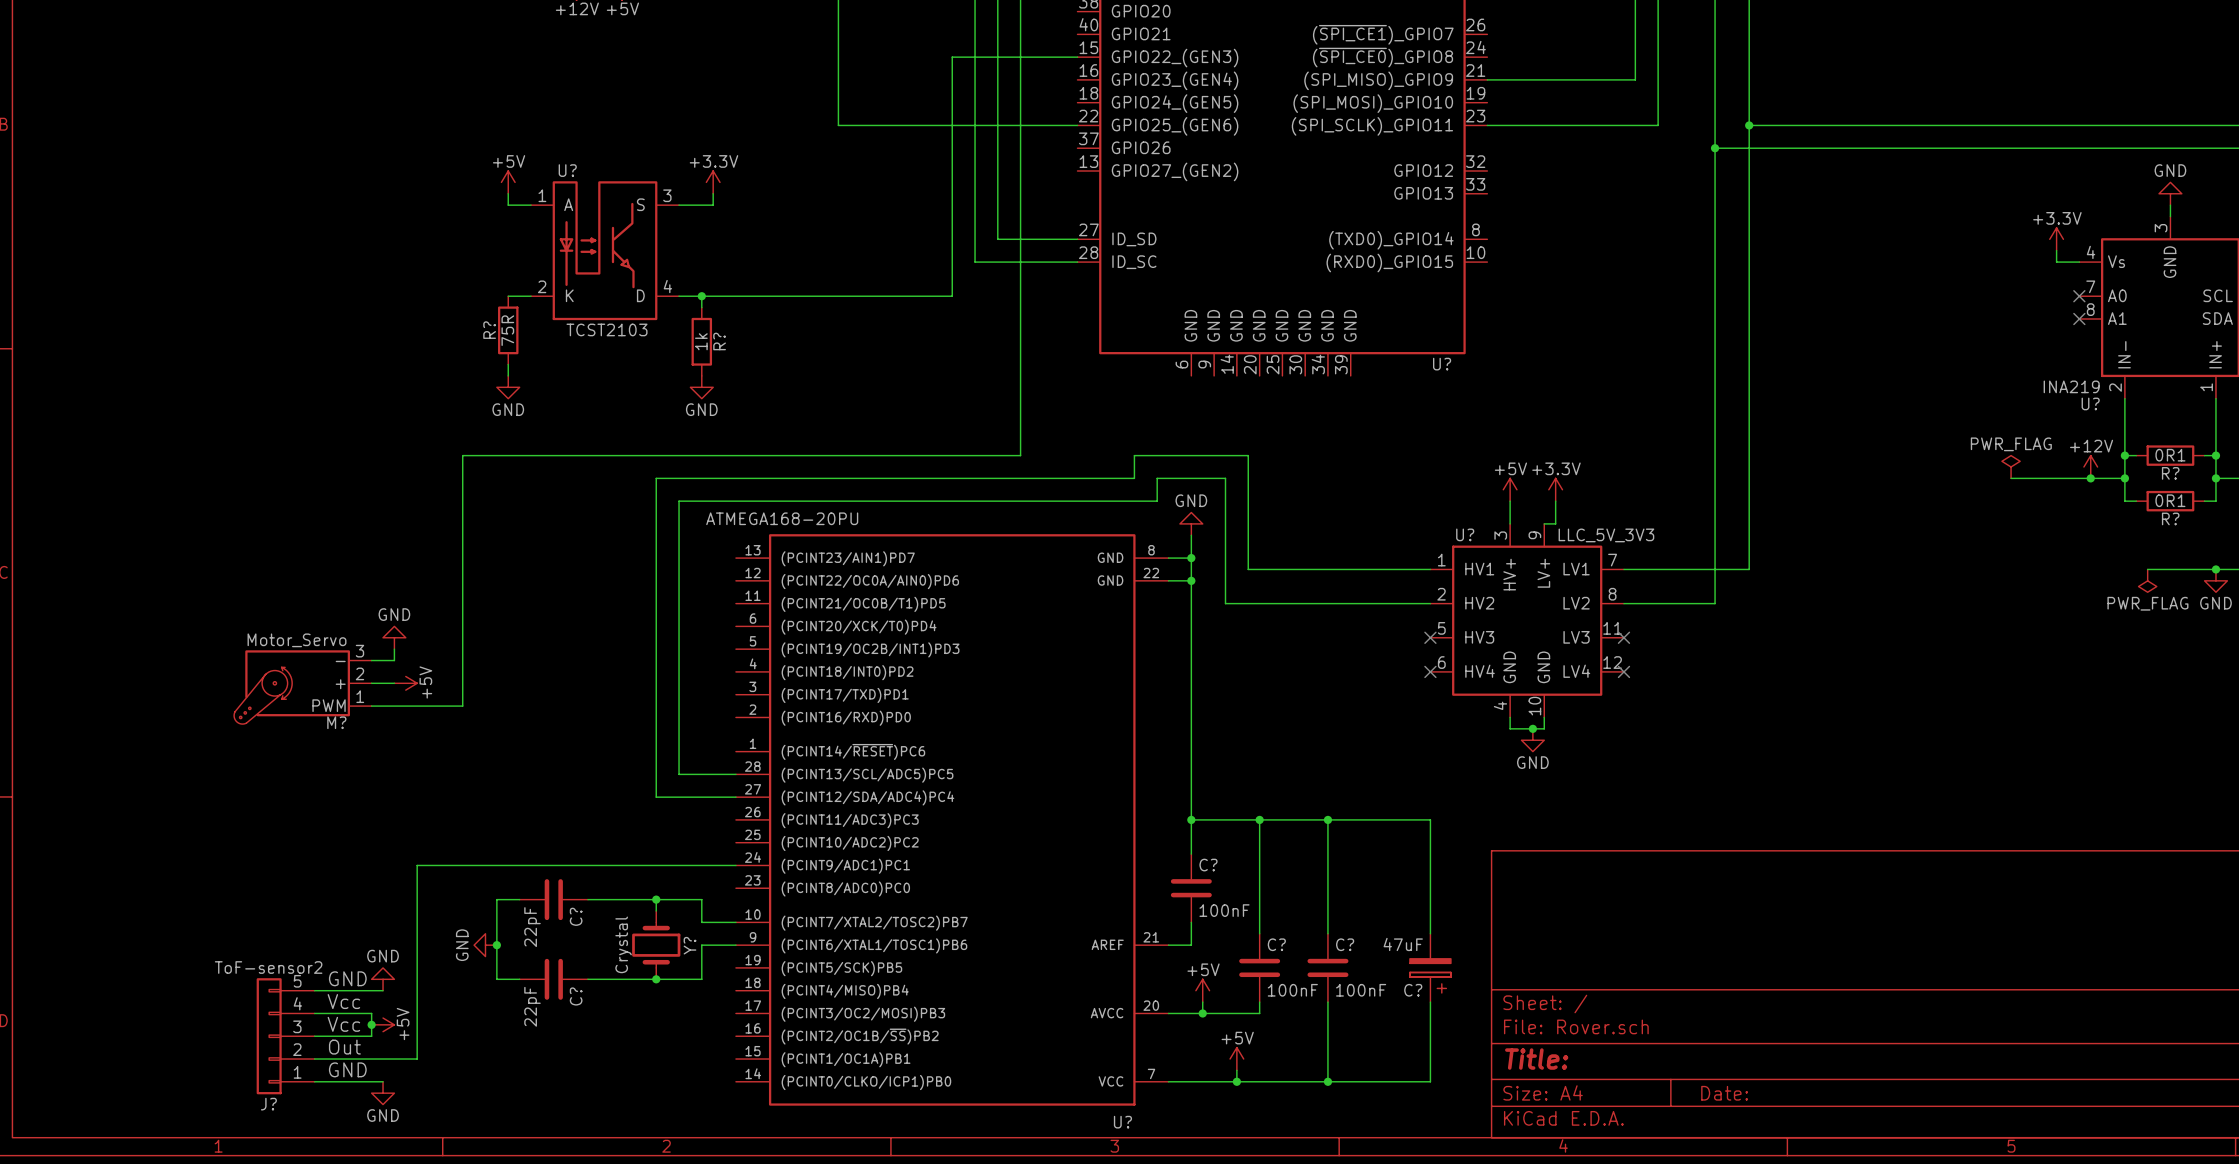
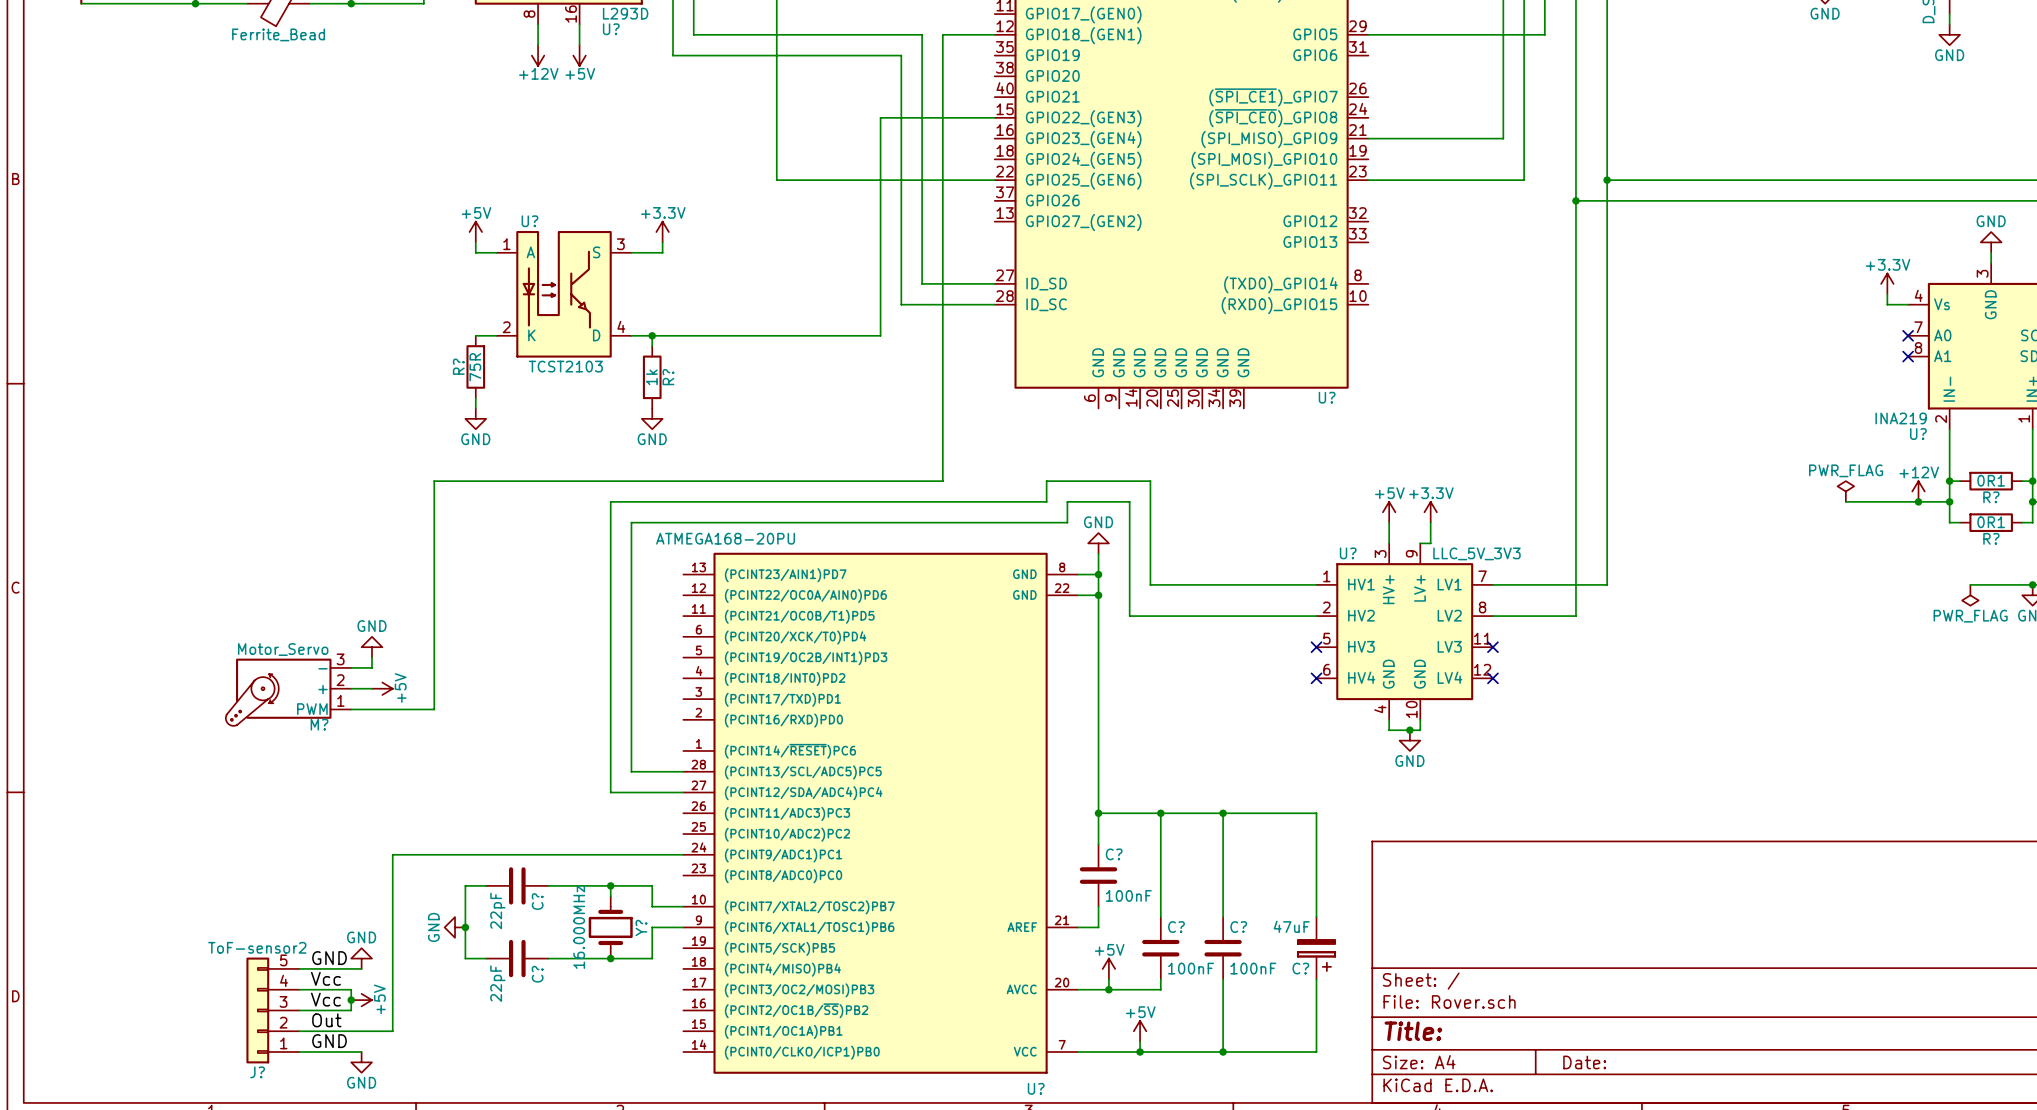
Y? value: Crystal (623, 944) -> 16.000MHz (579, 927)

